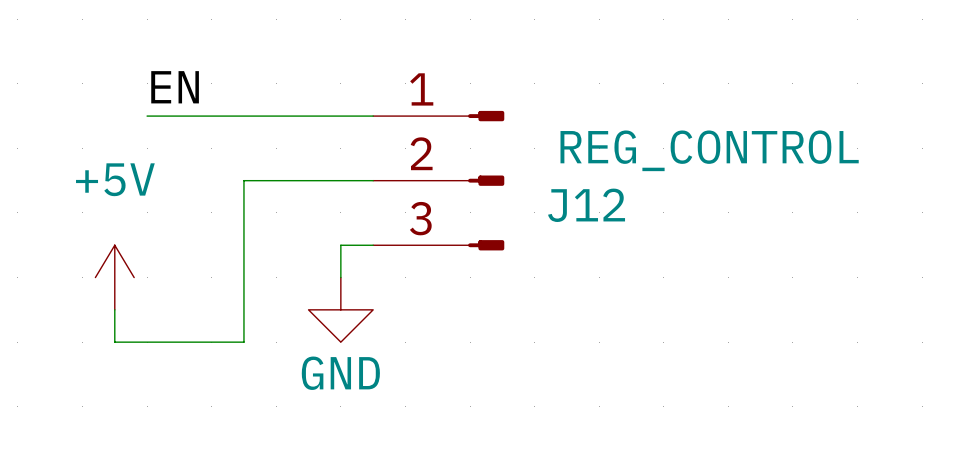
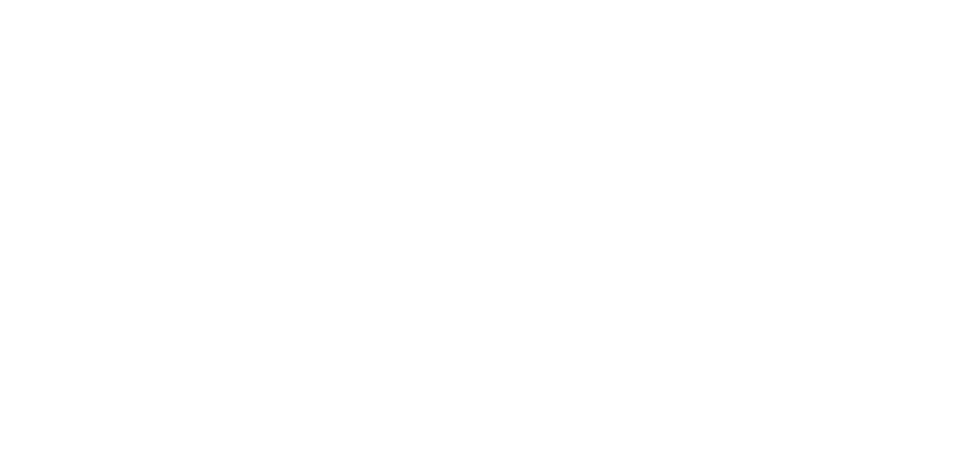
label: EN (175, 87) -> none
wire: (147, 116) (373, 116) -> none
wire: (373, 180) (243, 180) (243, 342) (114, 342) (114, 309) -> none
J12: REG_CONTROL (438, 180) -> none
wire: (373, 245) (340, 245) (340, 277) -> none
power symbol: +5V (114, 277) -> none
power symbol: GND (340, 309) -> none

